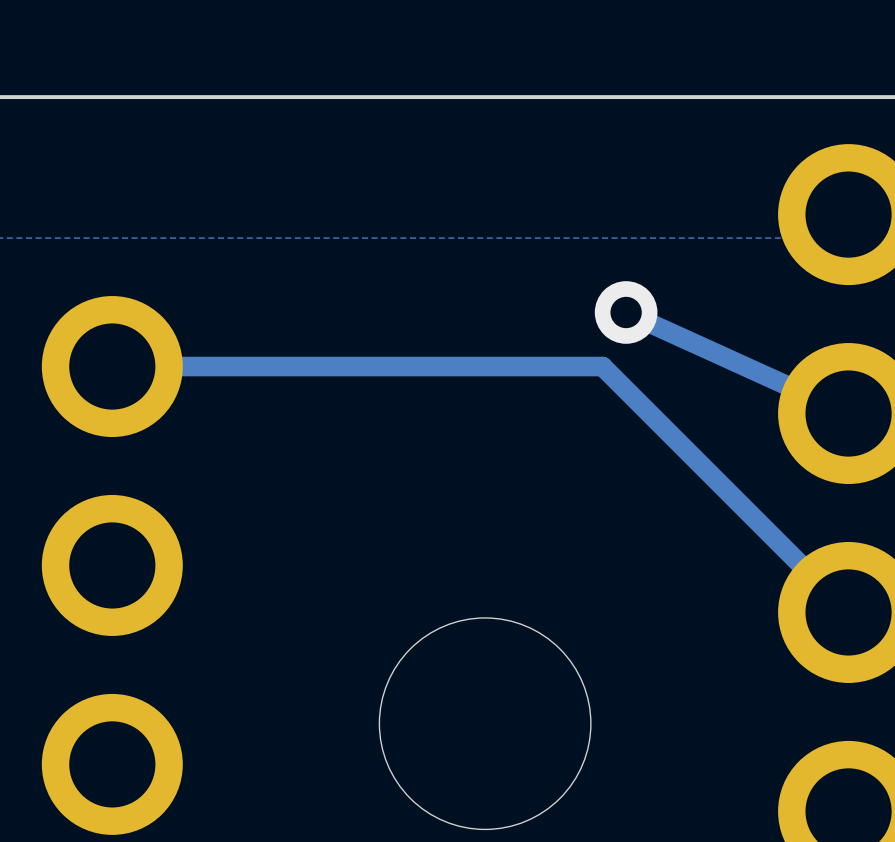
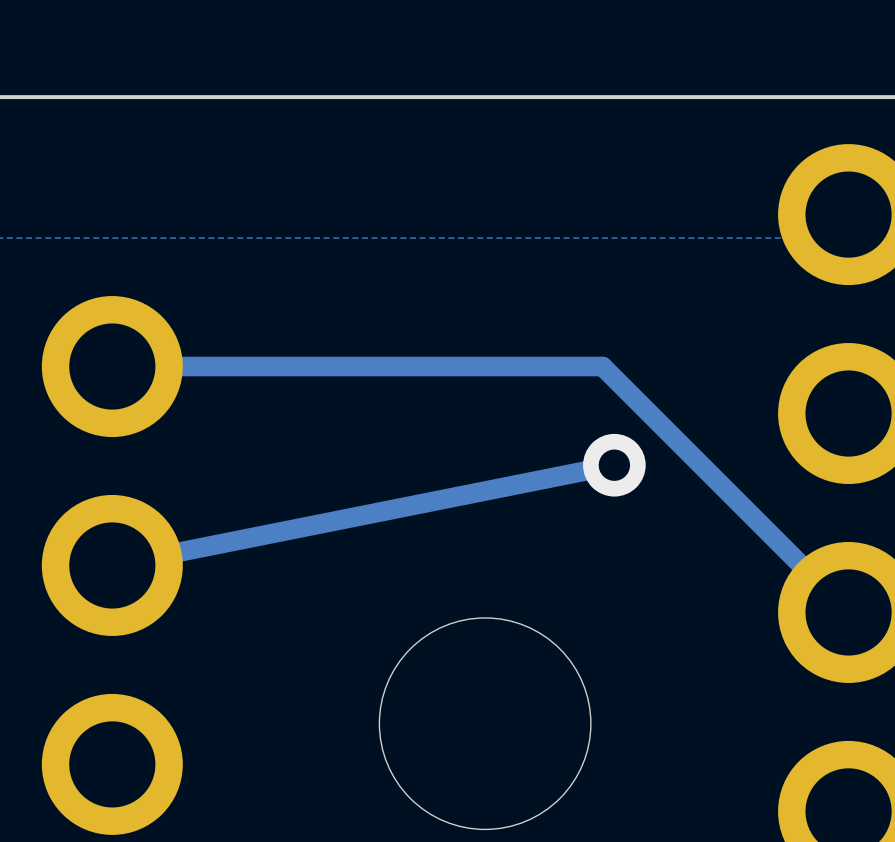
track: (626, 312) (848, 413) -> none
via position: (626, 312) -> (614, 465)
track: none -> (614, 465) (112, 565)

